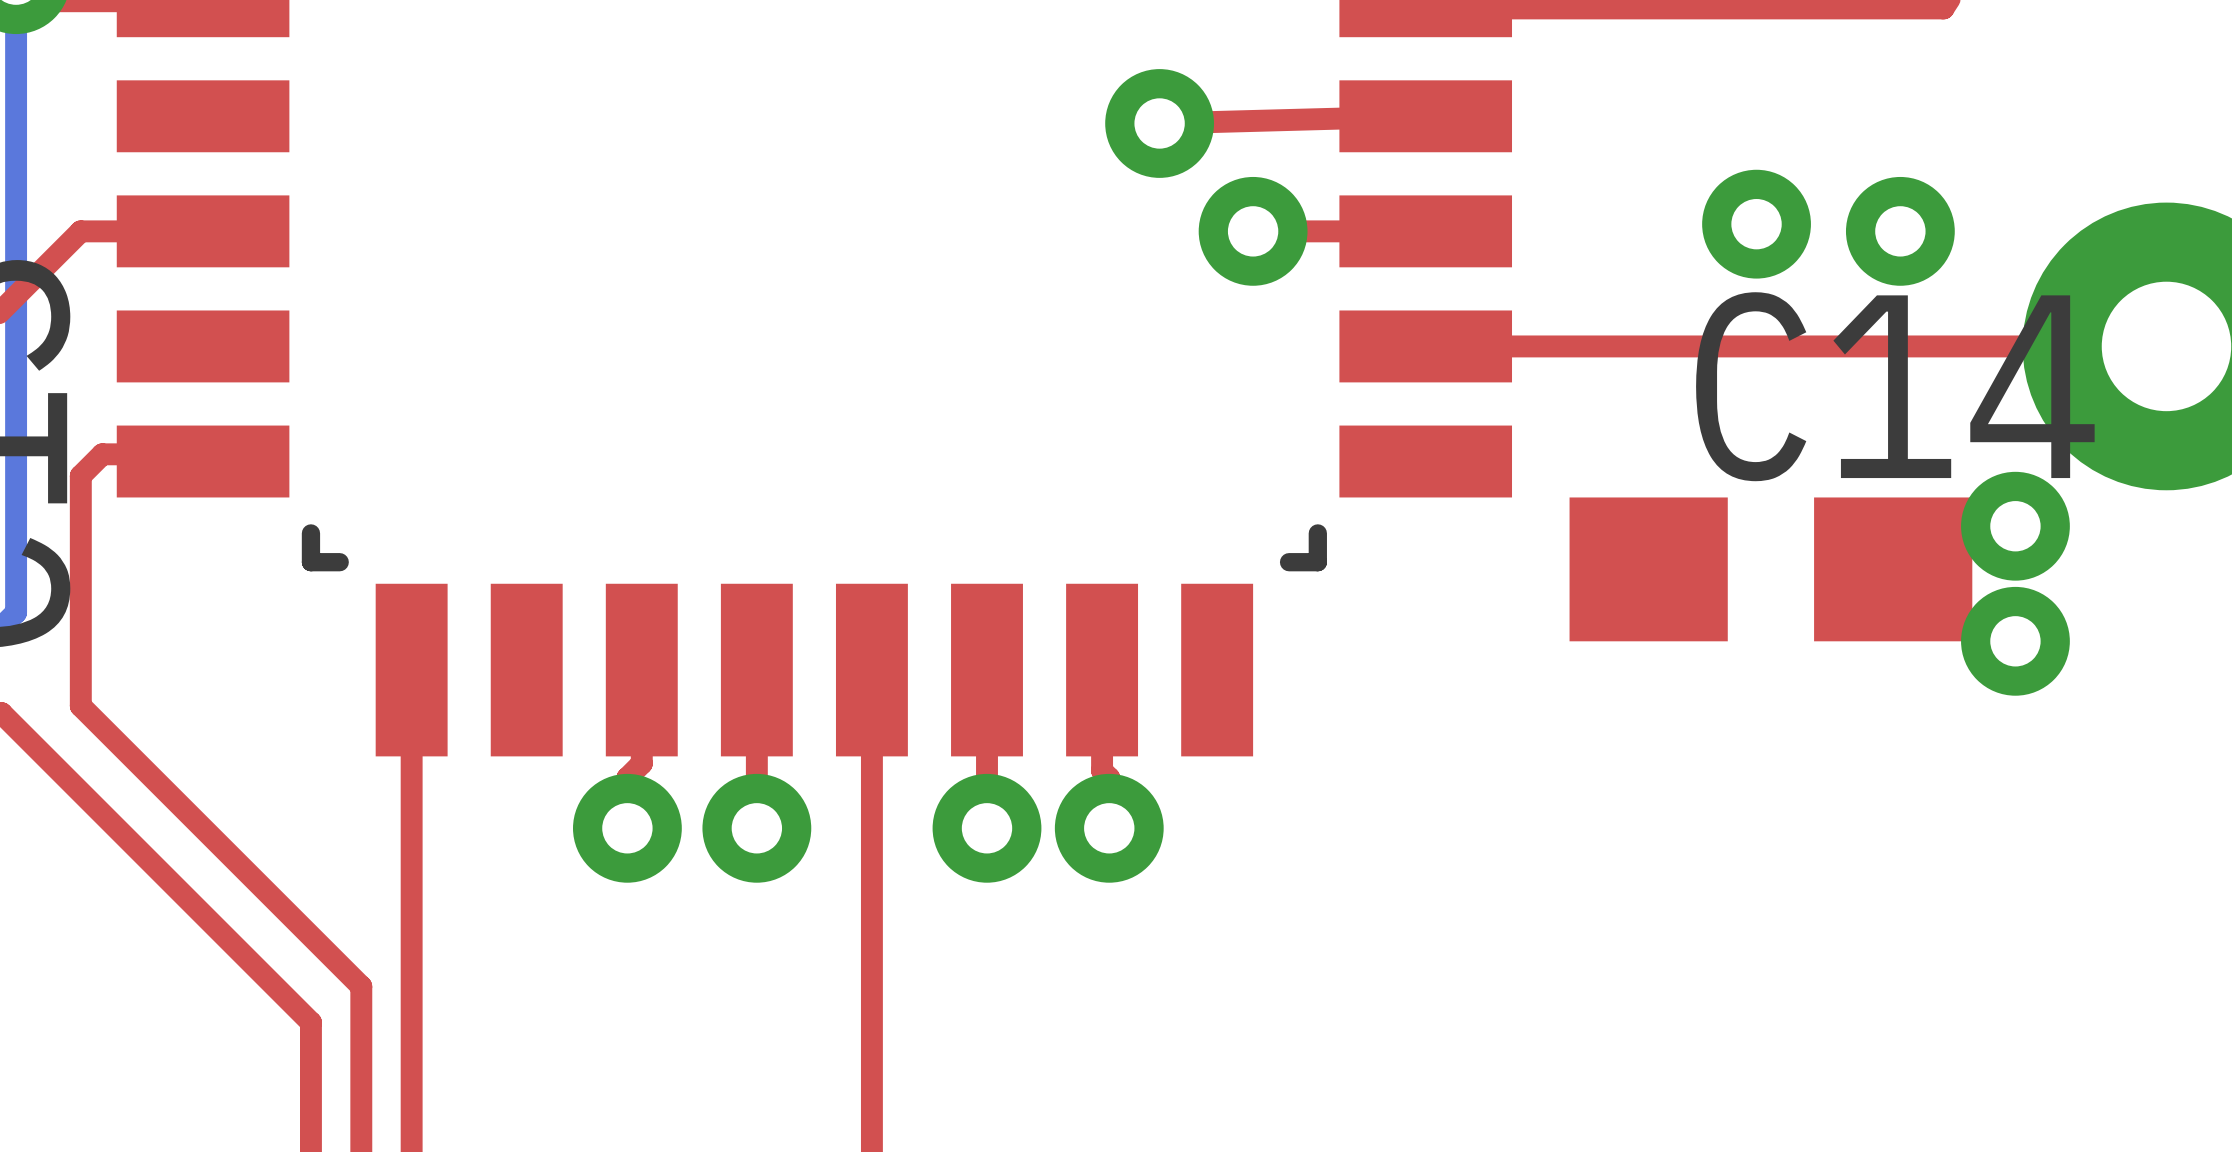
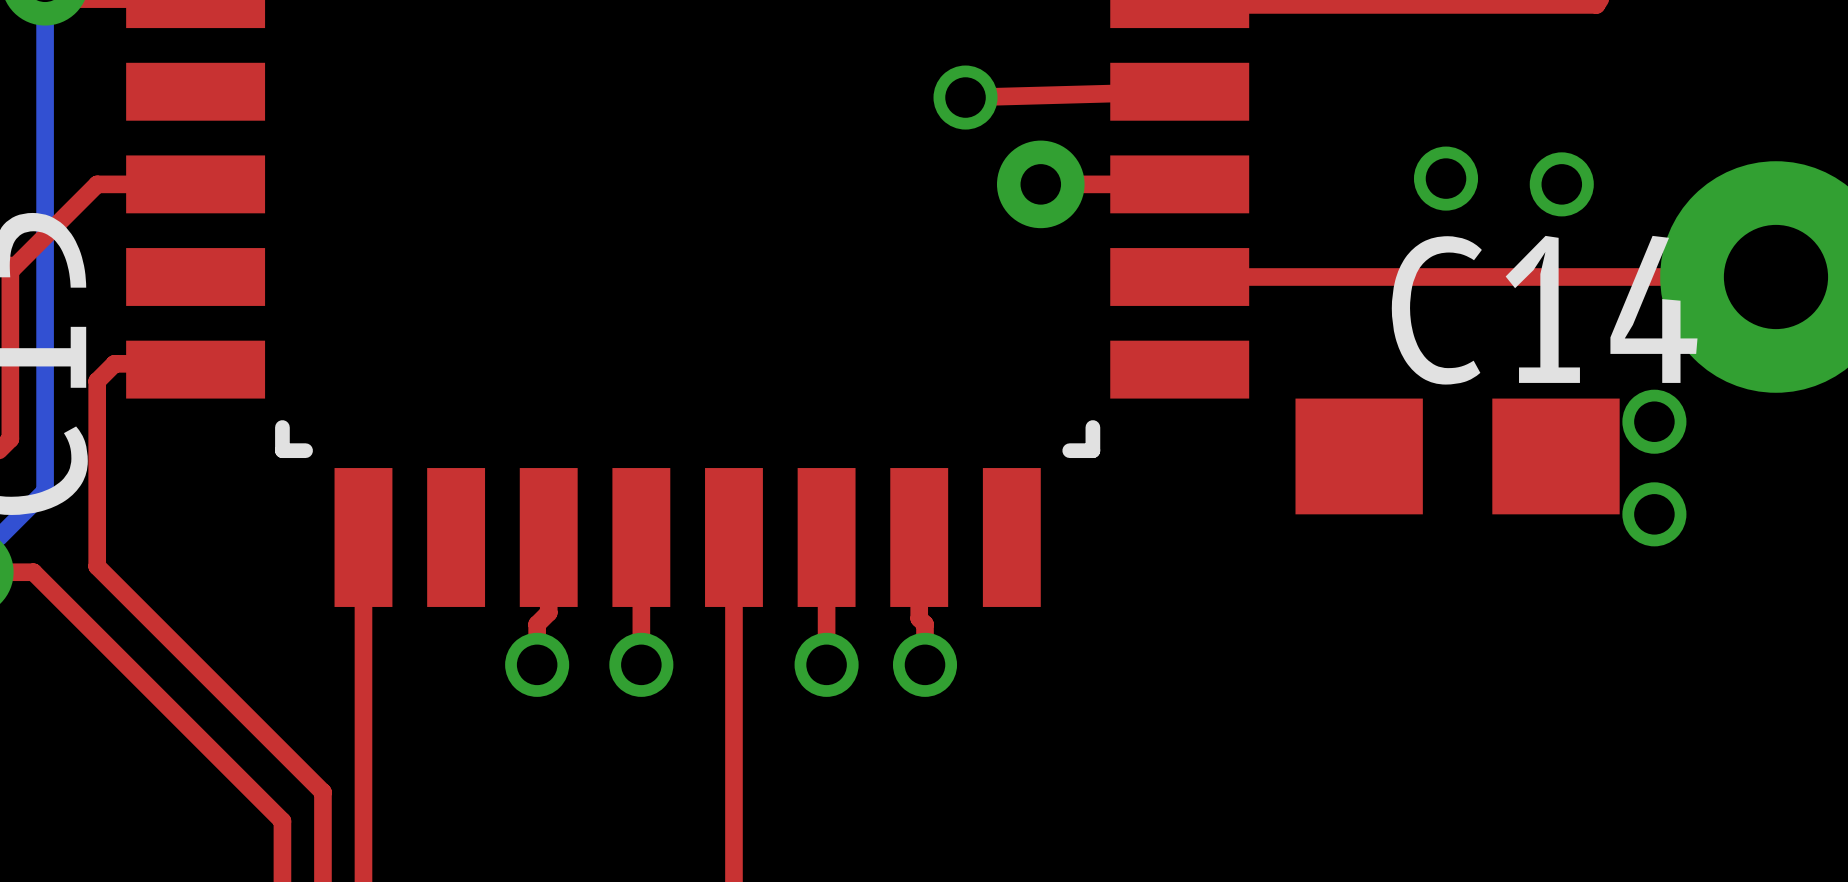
via size: [1105, 69, 1215, 178] -> [933, 65, 998, 130]
via size: [1702, 169, 1811, 279] -> [1413, 146, 1479, 211]
via size: [1845, 176, 1955, 286] -> [1529, 152, 1594, 217]
via size: [1961, 471, 2070, 581] -> [1622, 389, 1687, 454]
via size: [1961, 586, 2070, 696] -> [1622, 482, 1687, 547]
via size: [573, 773, 682, 883] -> [505, 632, 570, 697]
via size: [702, 773, 812, 883] -> [609, 632, 674, 697]
via size: [932, 773, 1042, 883] -> [794, 632, 859, 697]
via size: [1054, 773, 1164, 883] -> [892, 632, 958, 697]

